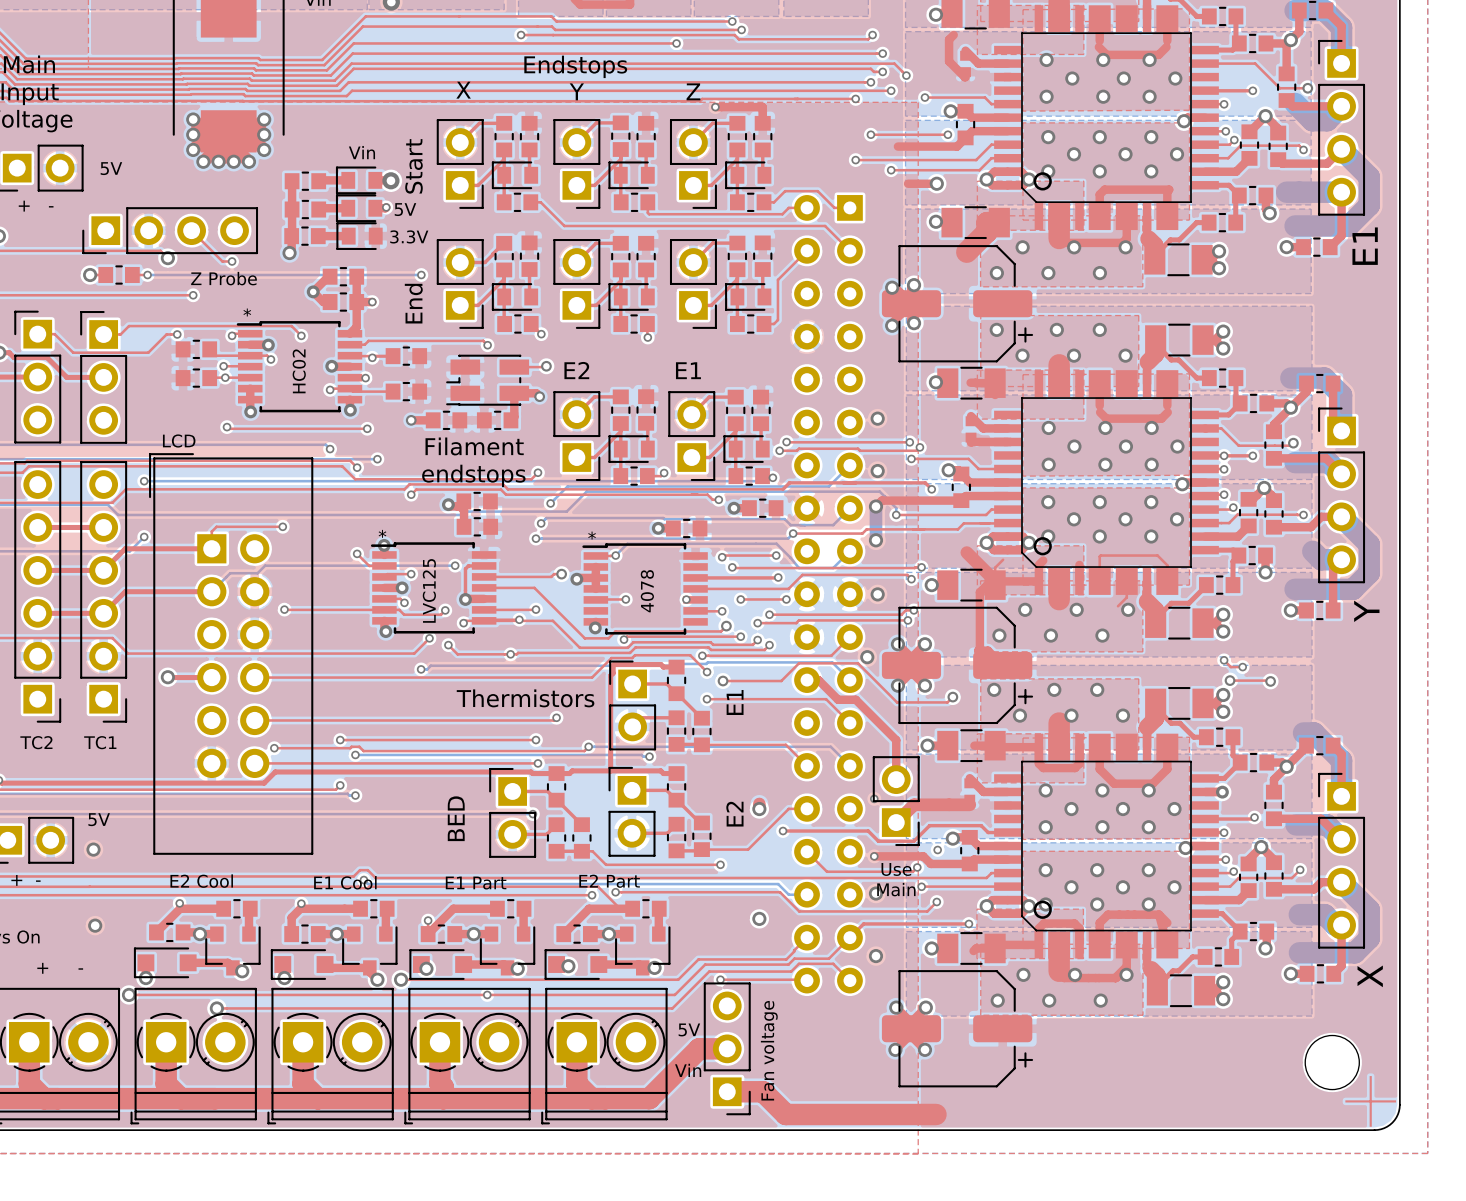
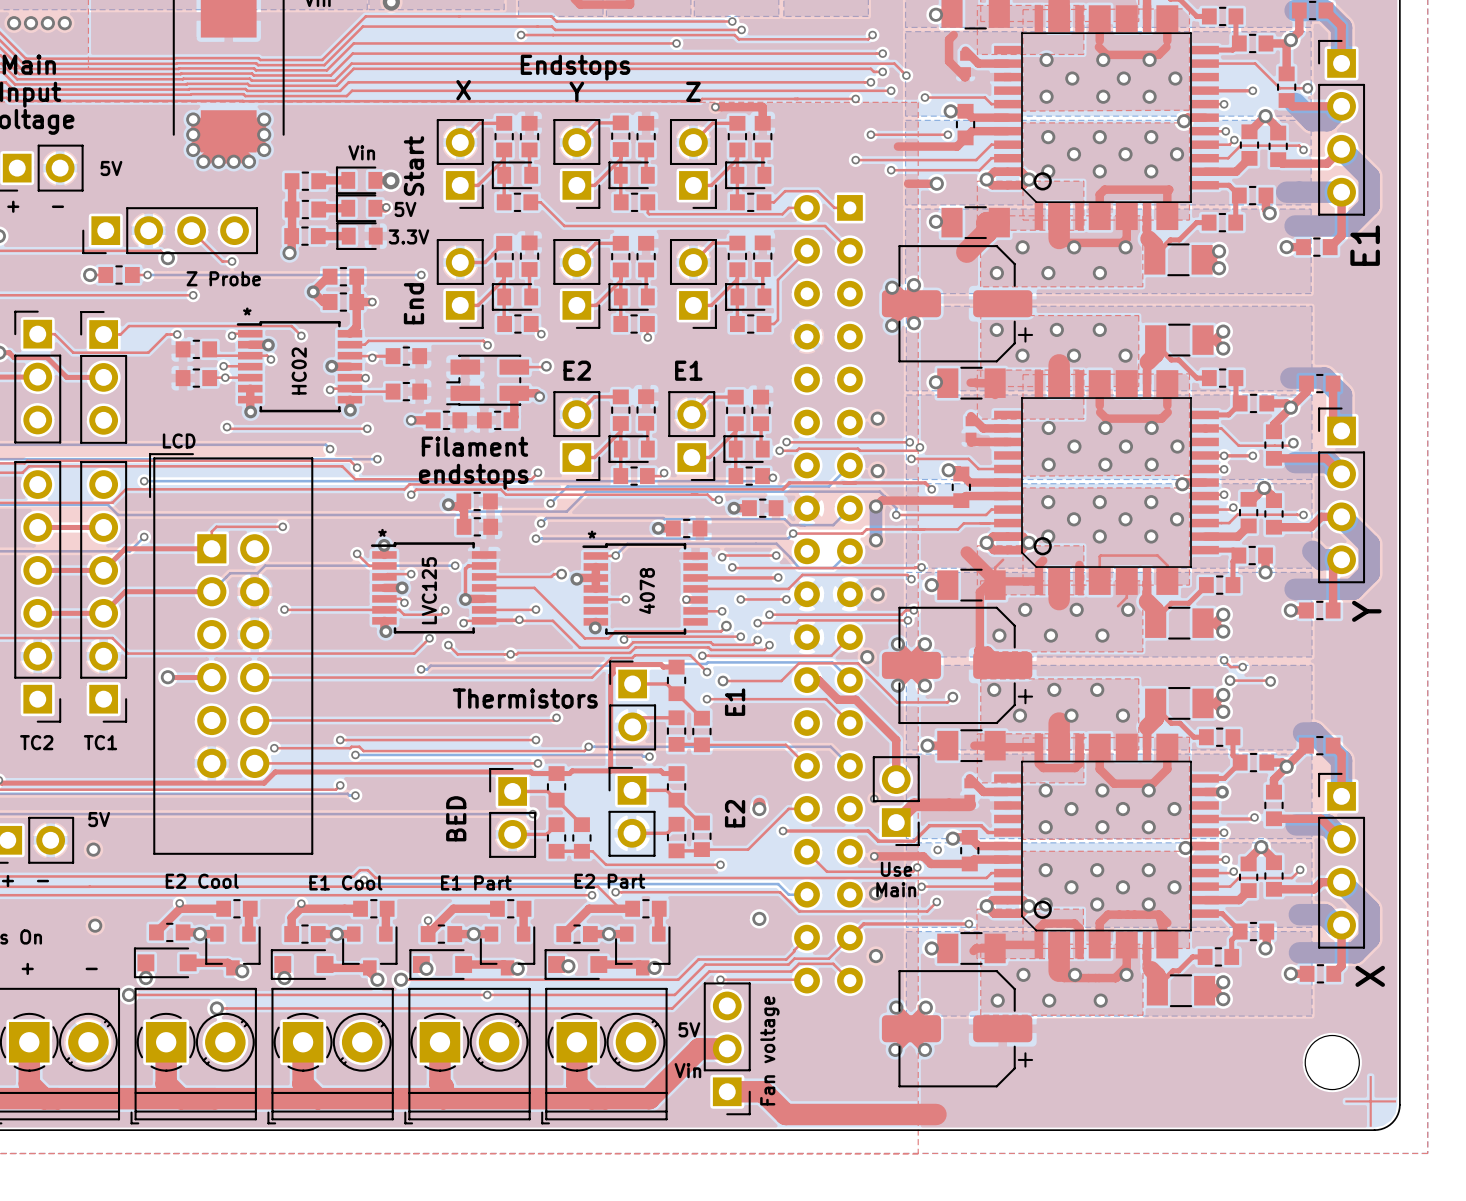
via: none -> (14, 23)
via: none -> (30, 23)
via: none -> (47, 23)
via: none -> (64, 23)

